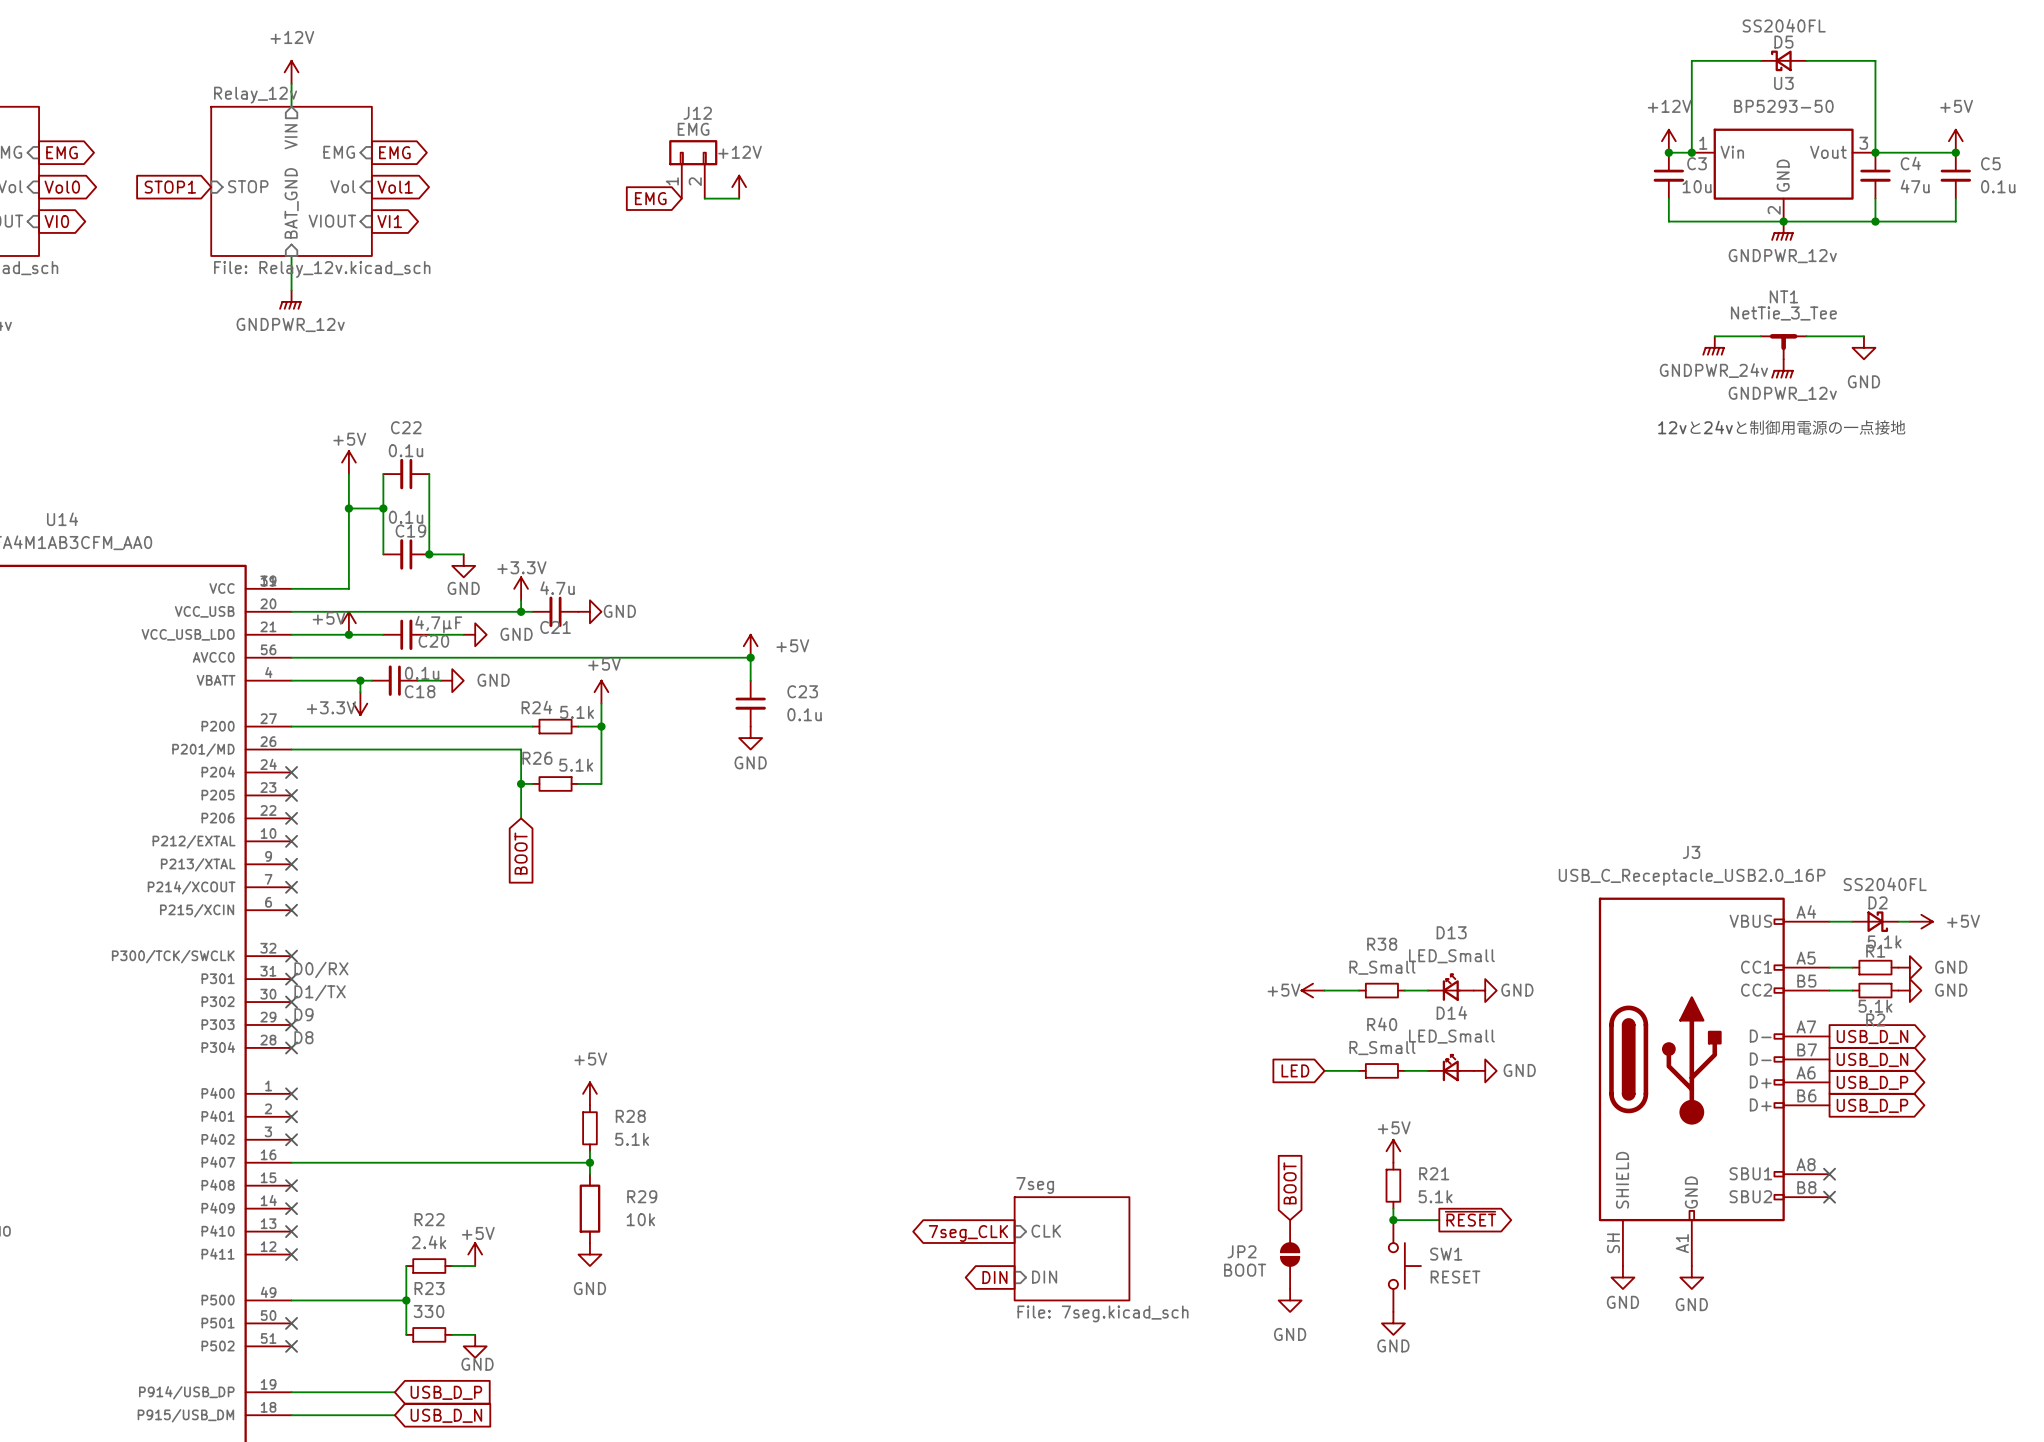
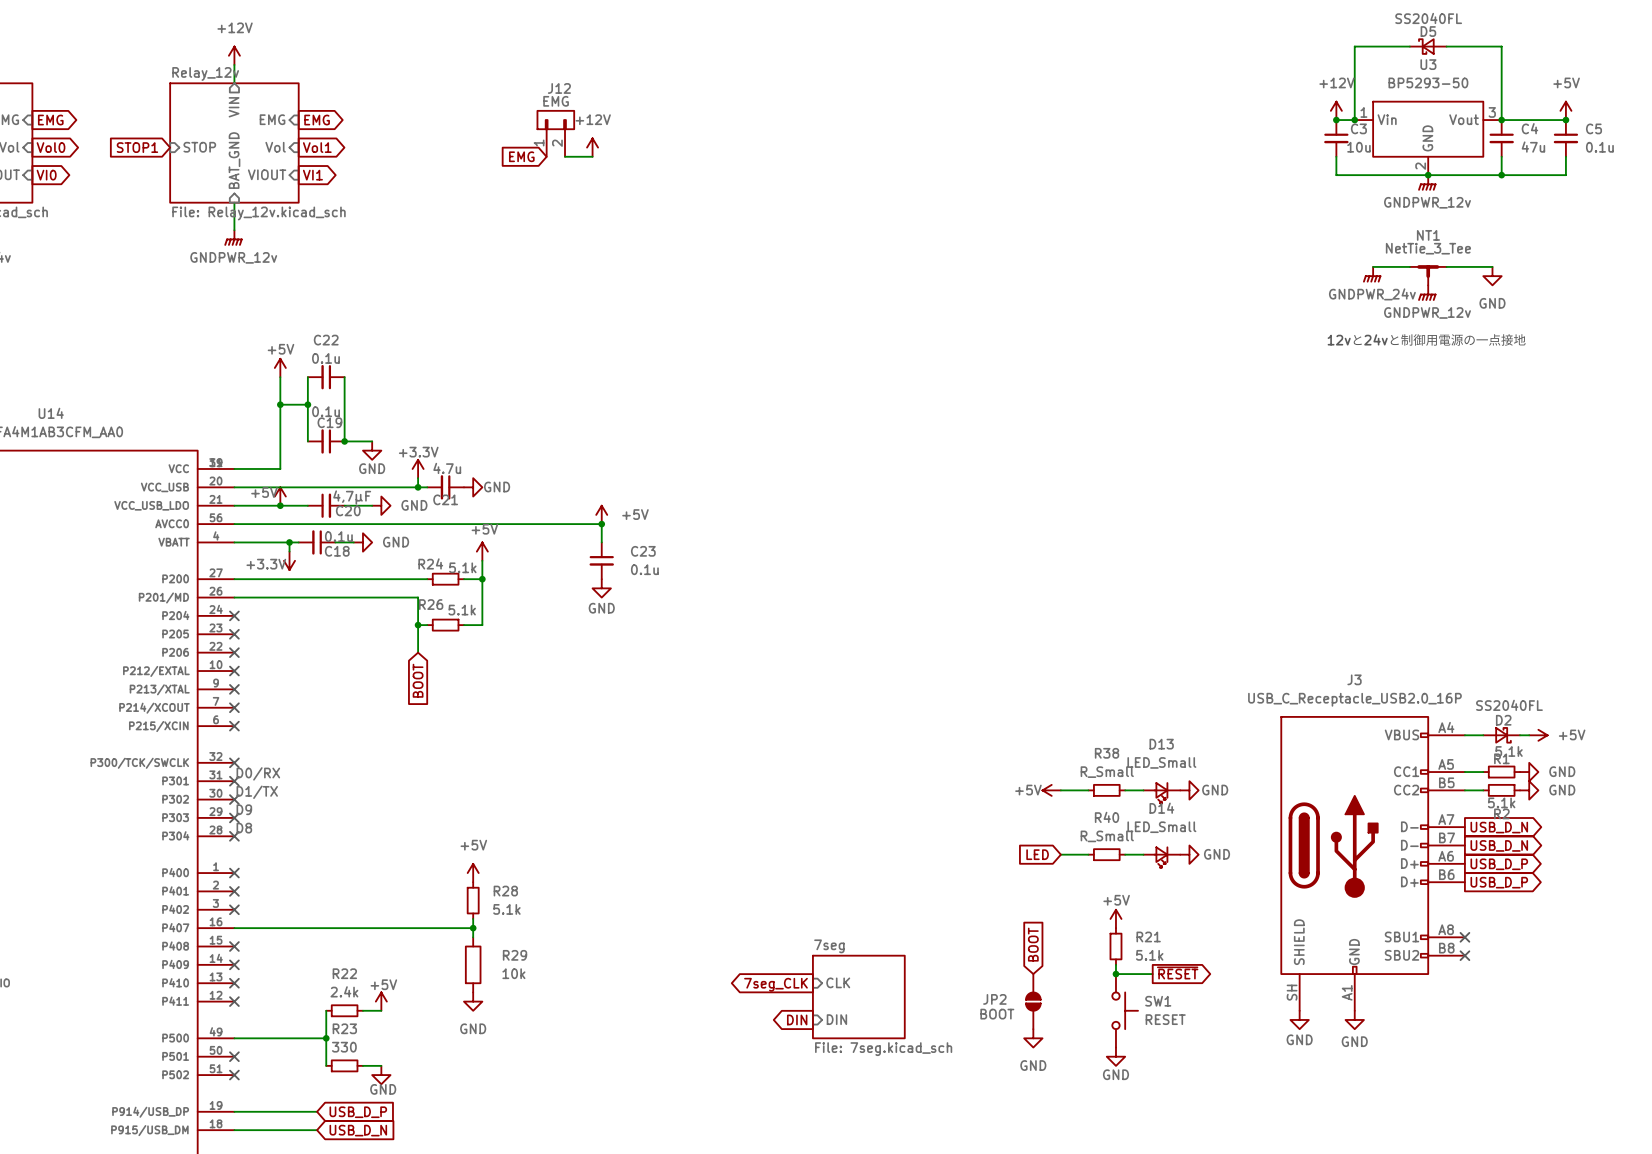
D13 rotation: 0° (1451, 987) -> 180° (1161, 792)
D14 rotation: 0° (1451, 1068) -> 180° (1161, 856)

